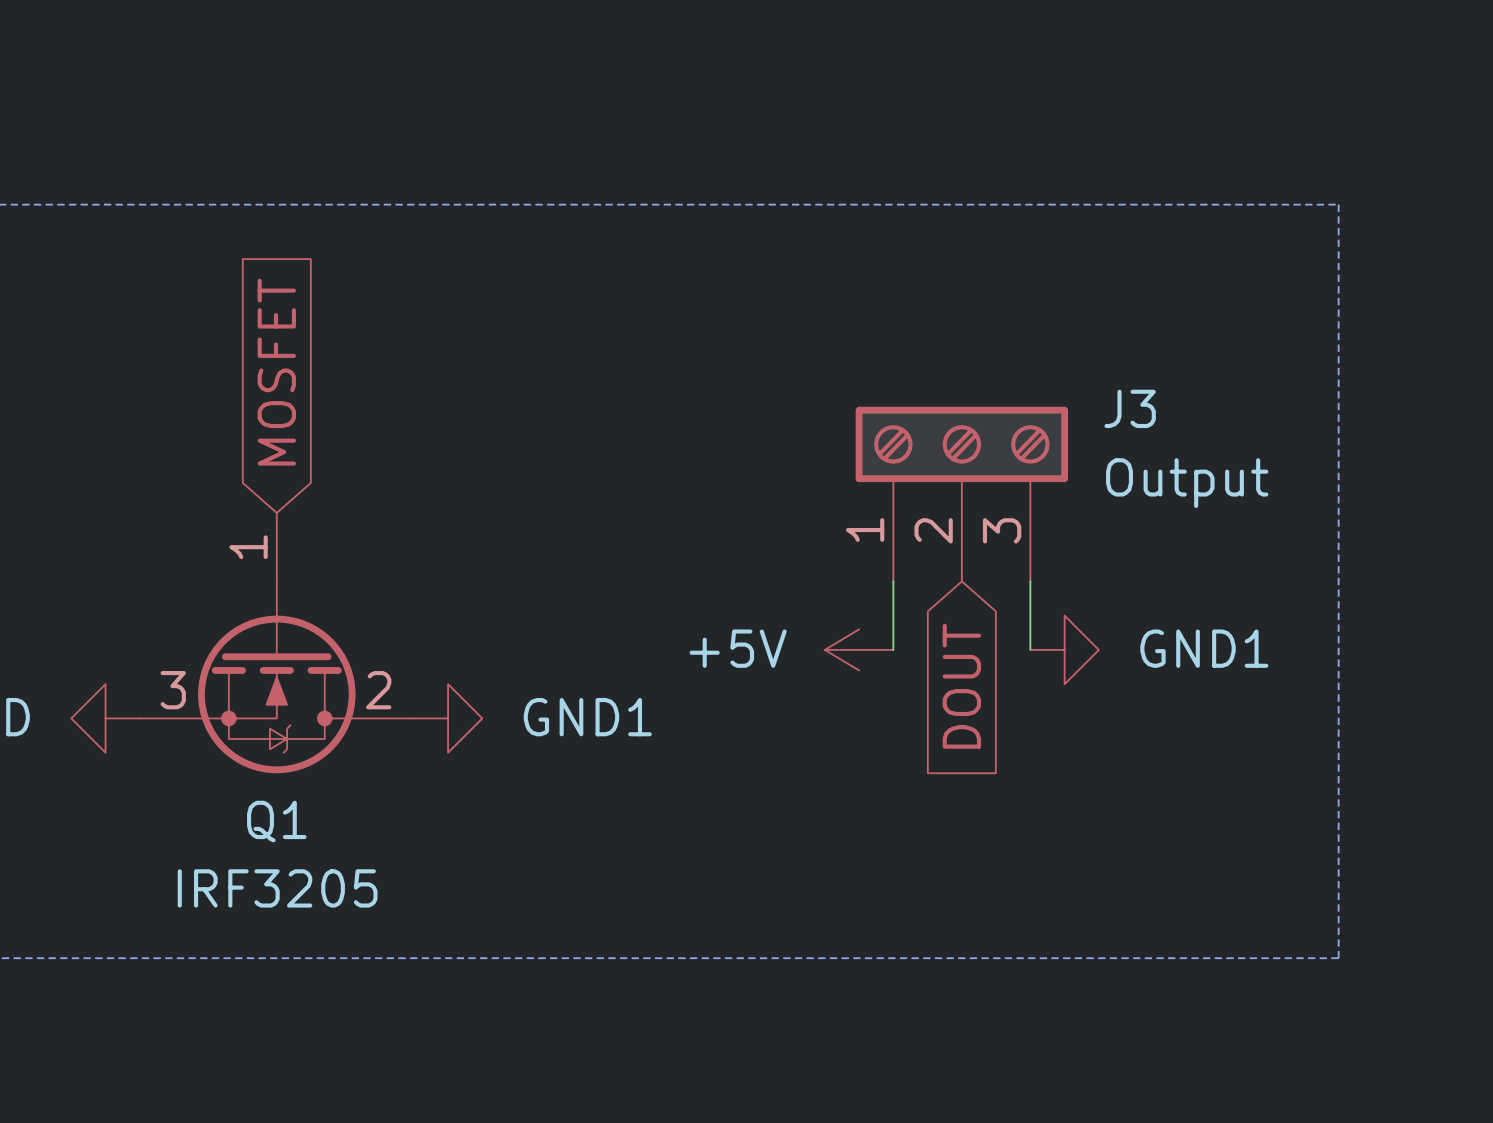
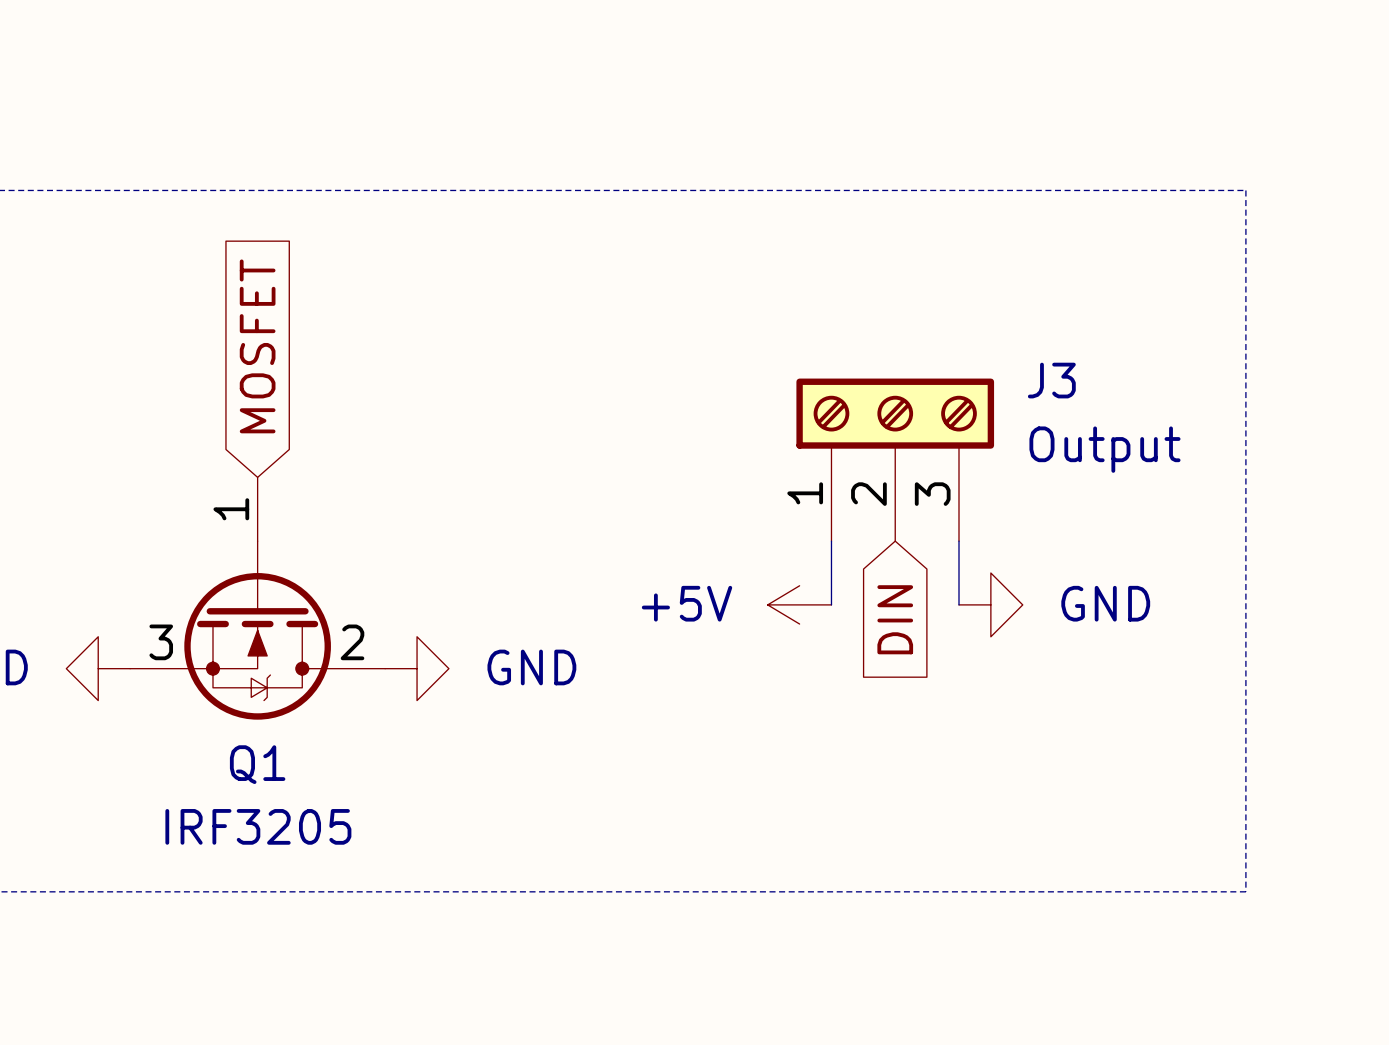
power symbol: GND1 (1064, 649) -> GND (990, 604)
global label: DOUT (961, 686) -> DIN (895, 619)
power symbol: GND1 (448, 718) -> GND (417, 668)

